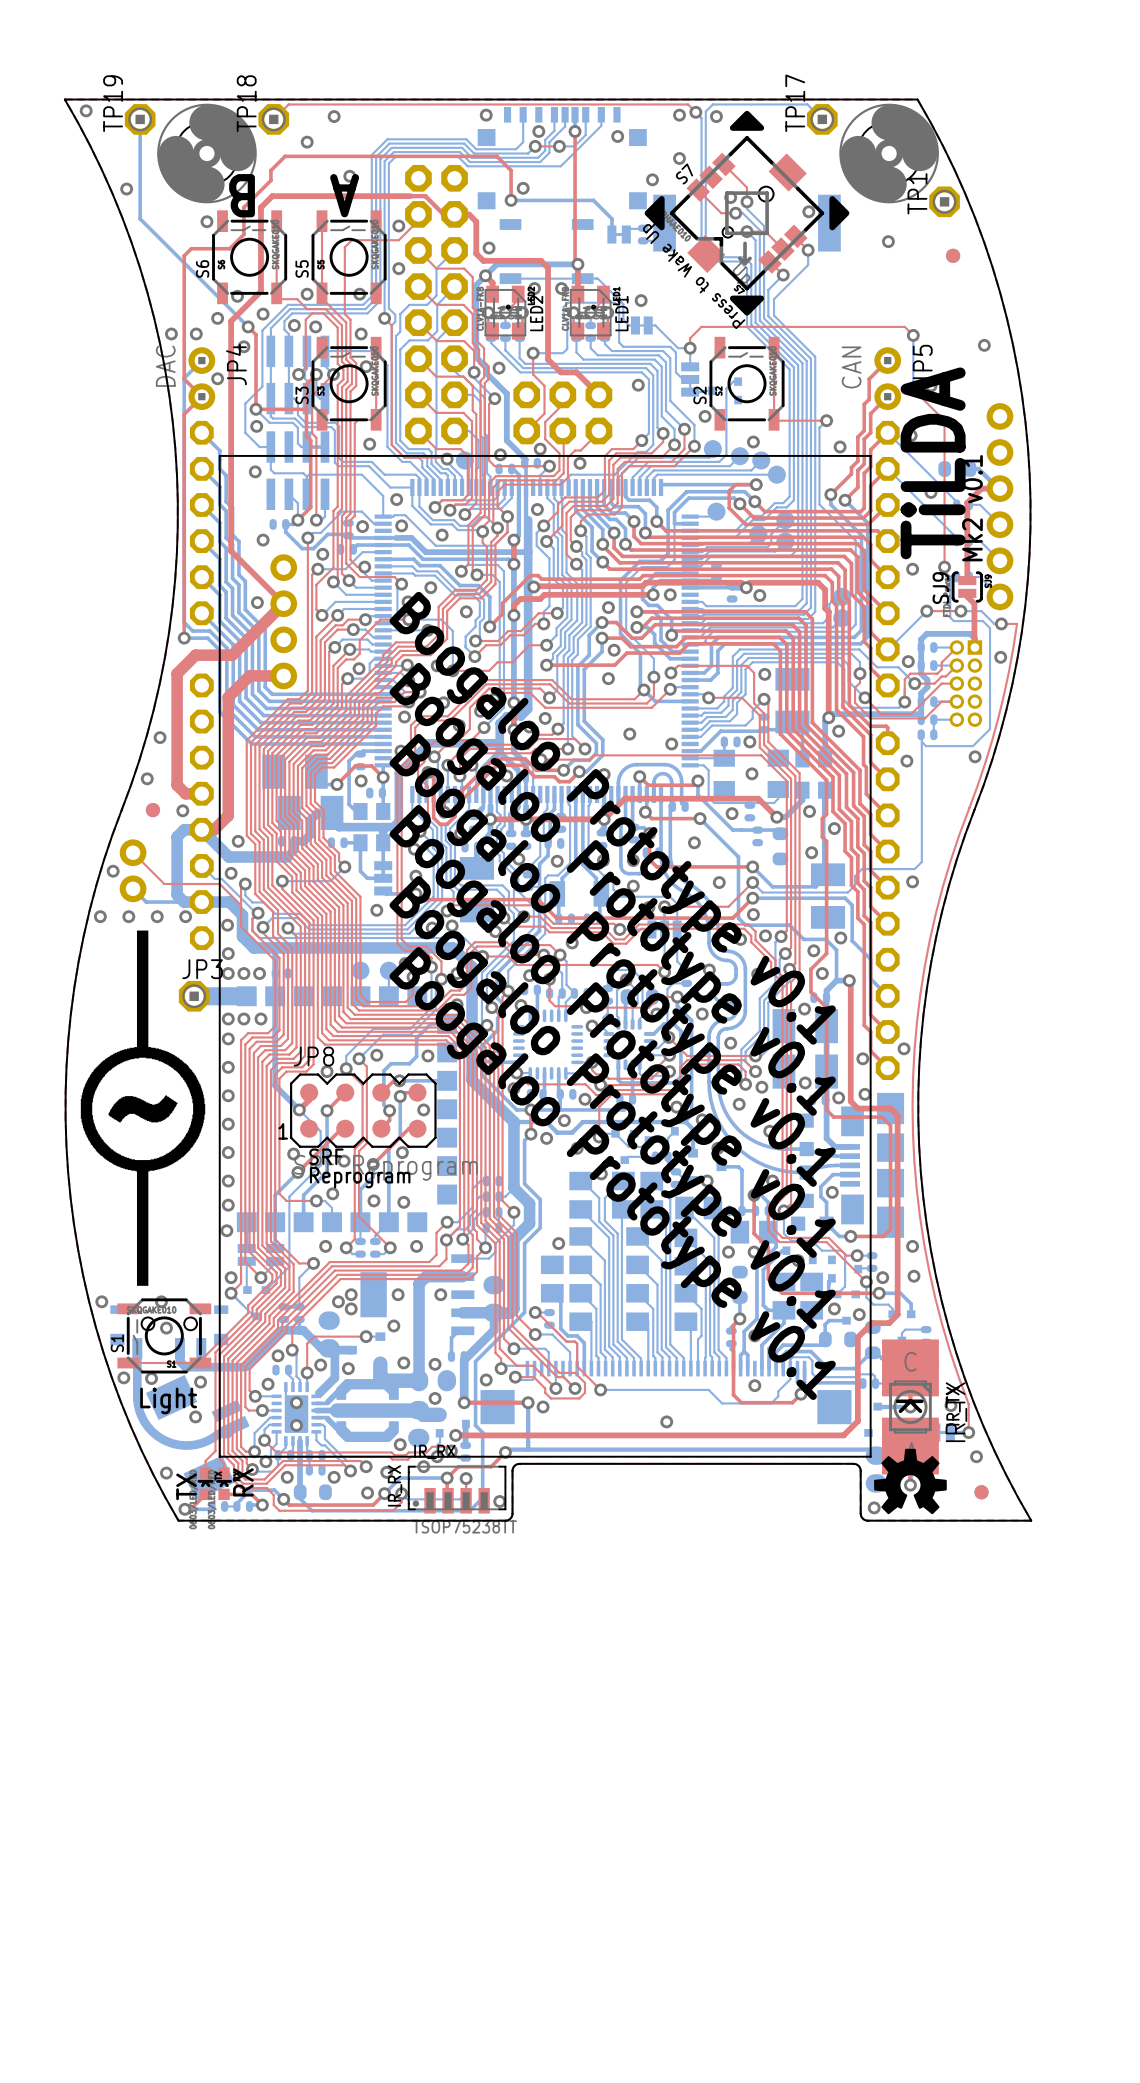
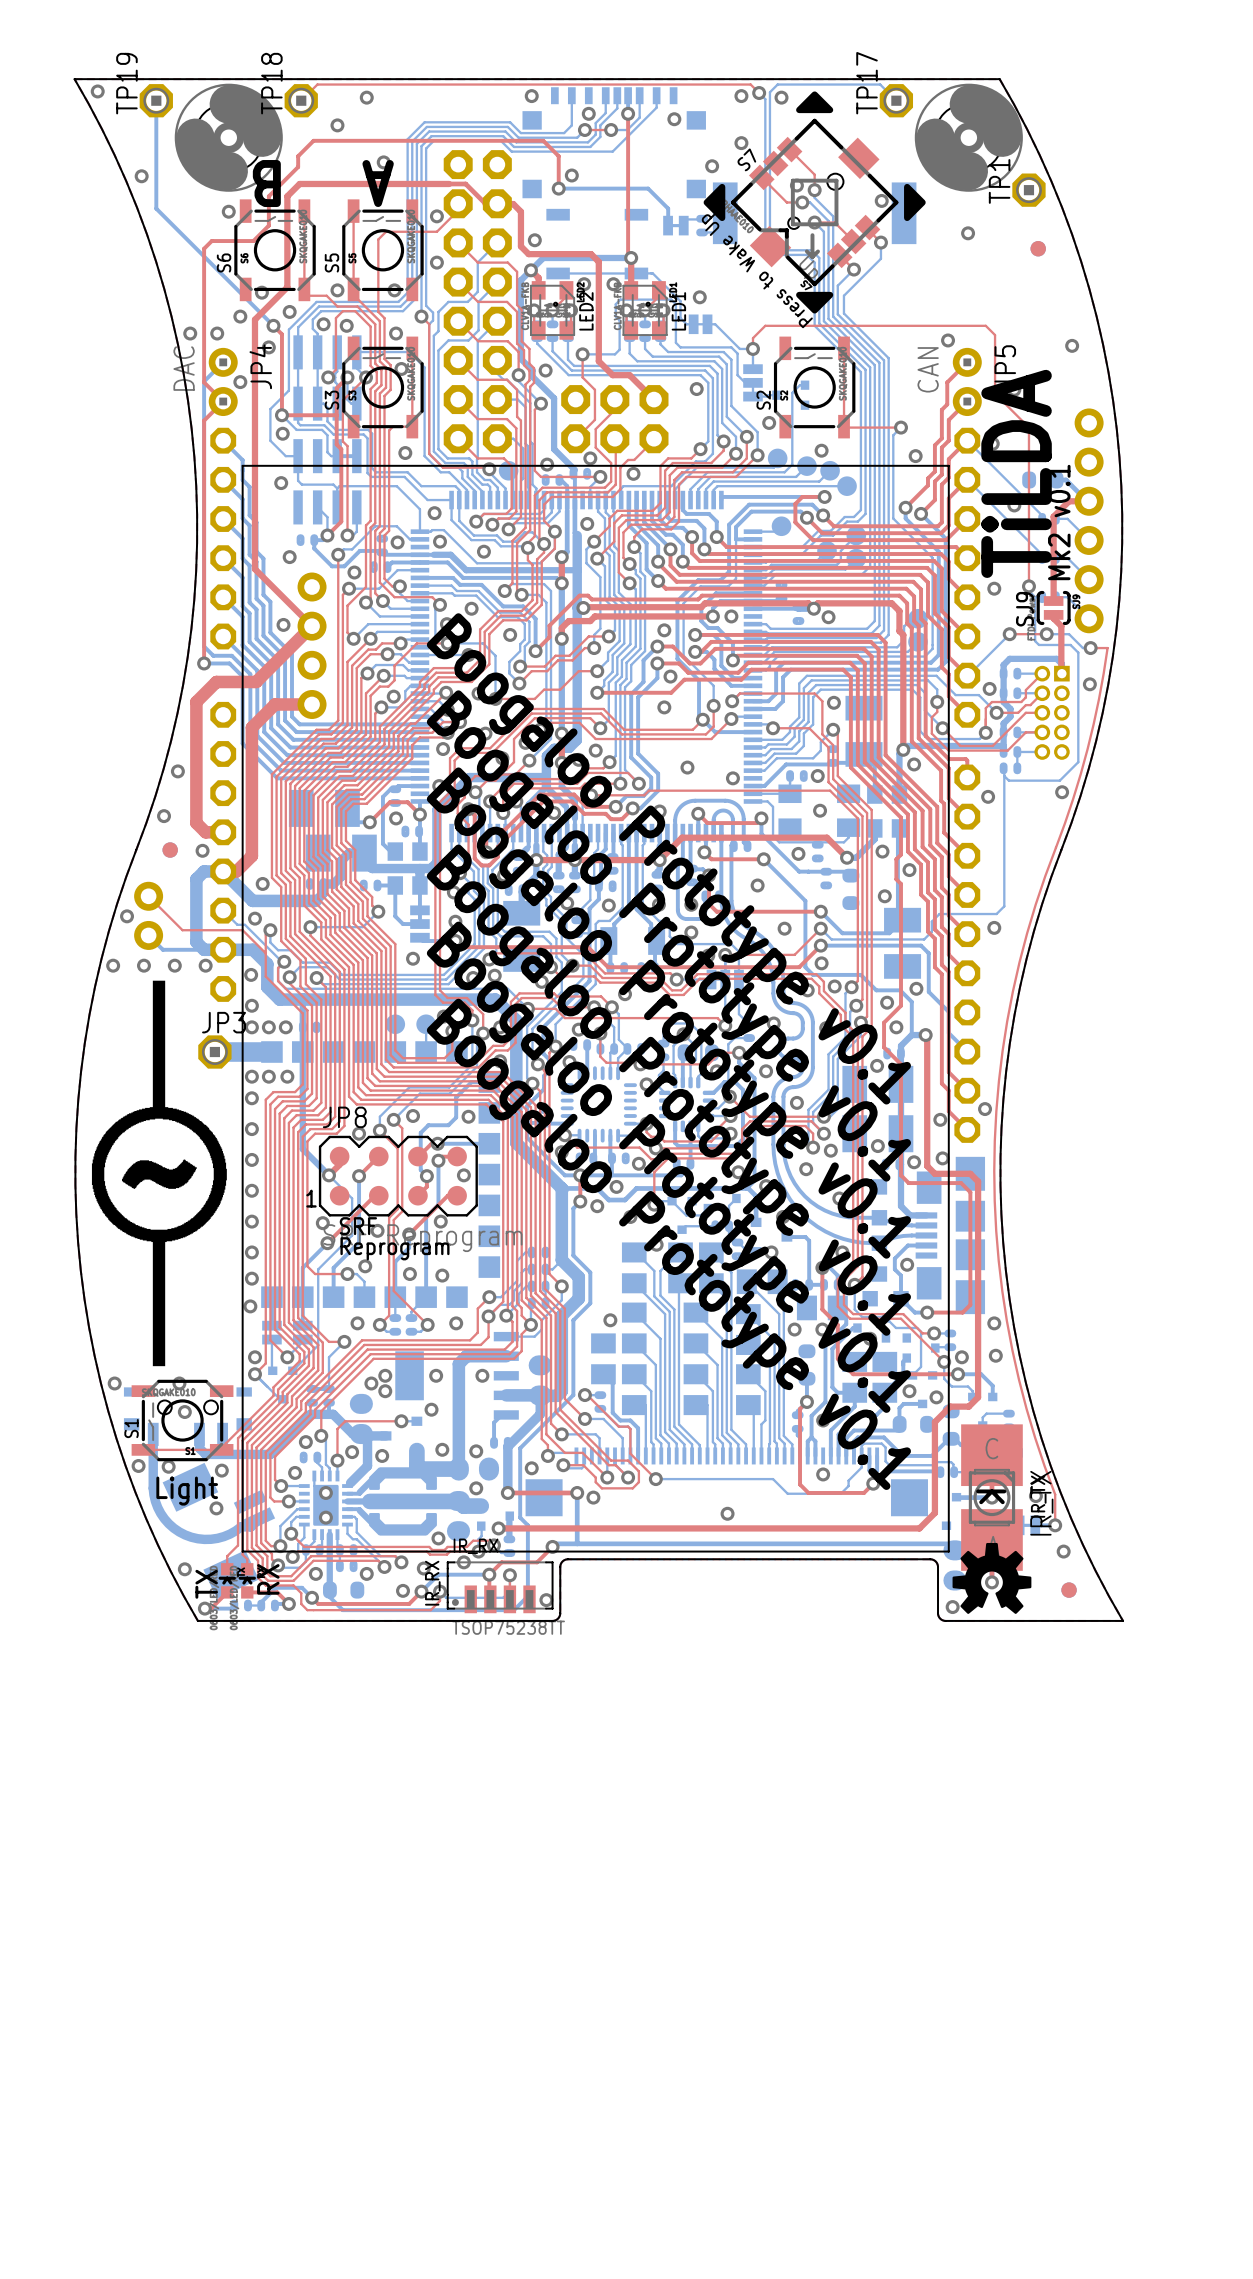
bottom track: (913, 335) (913, 389) -> none
top track: none -> (995, 335) (995, 393)
via: (913, 335) -> none
via: none -> (948, 340)

